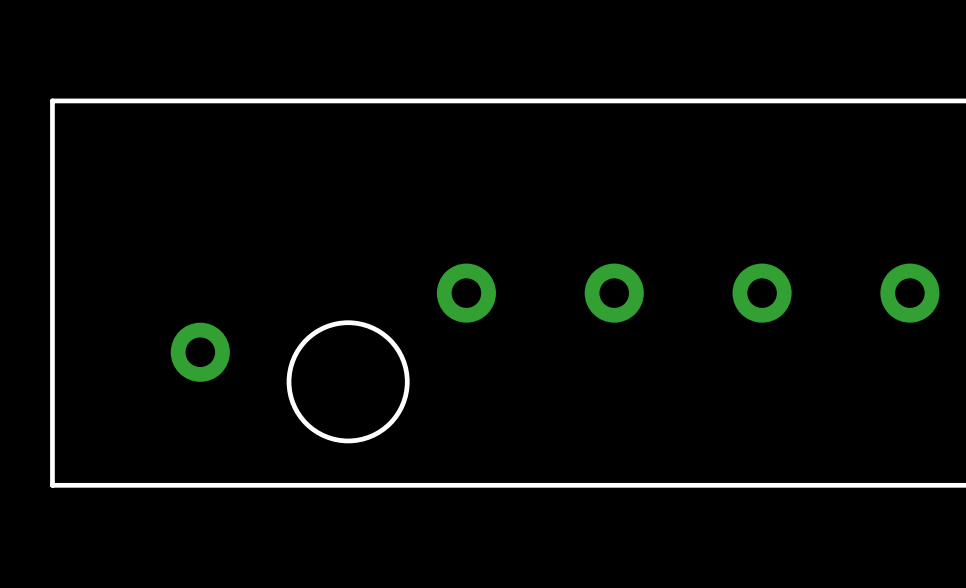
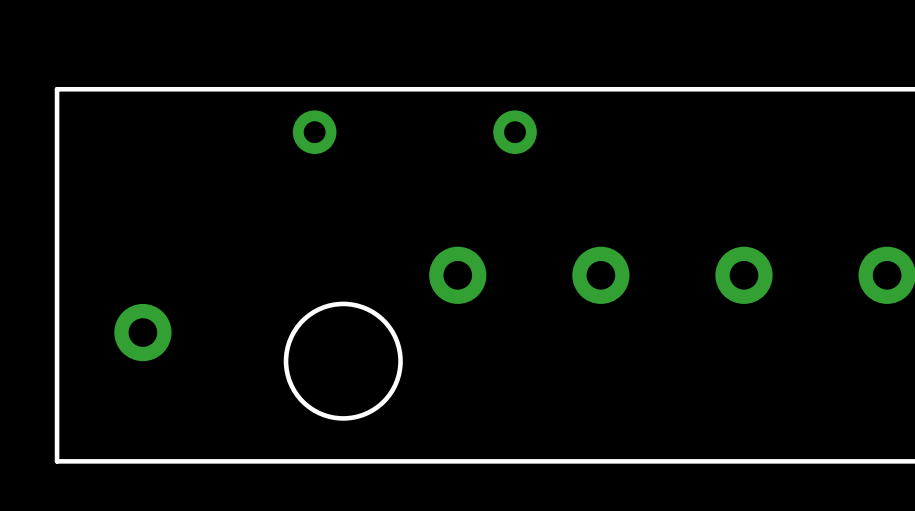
part: none -> (314, 132)
part: none -> (515, 132)
part position: (200, 352) -> (142, 332)

